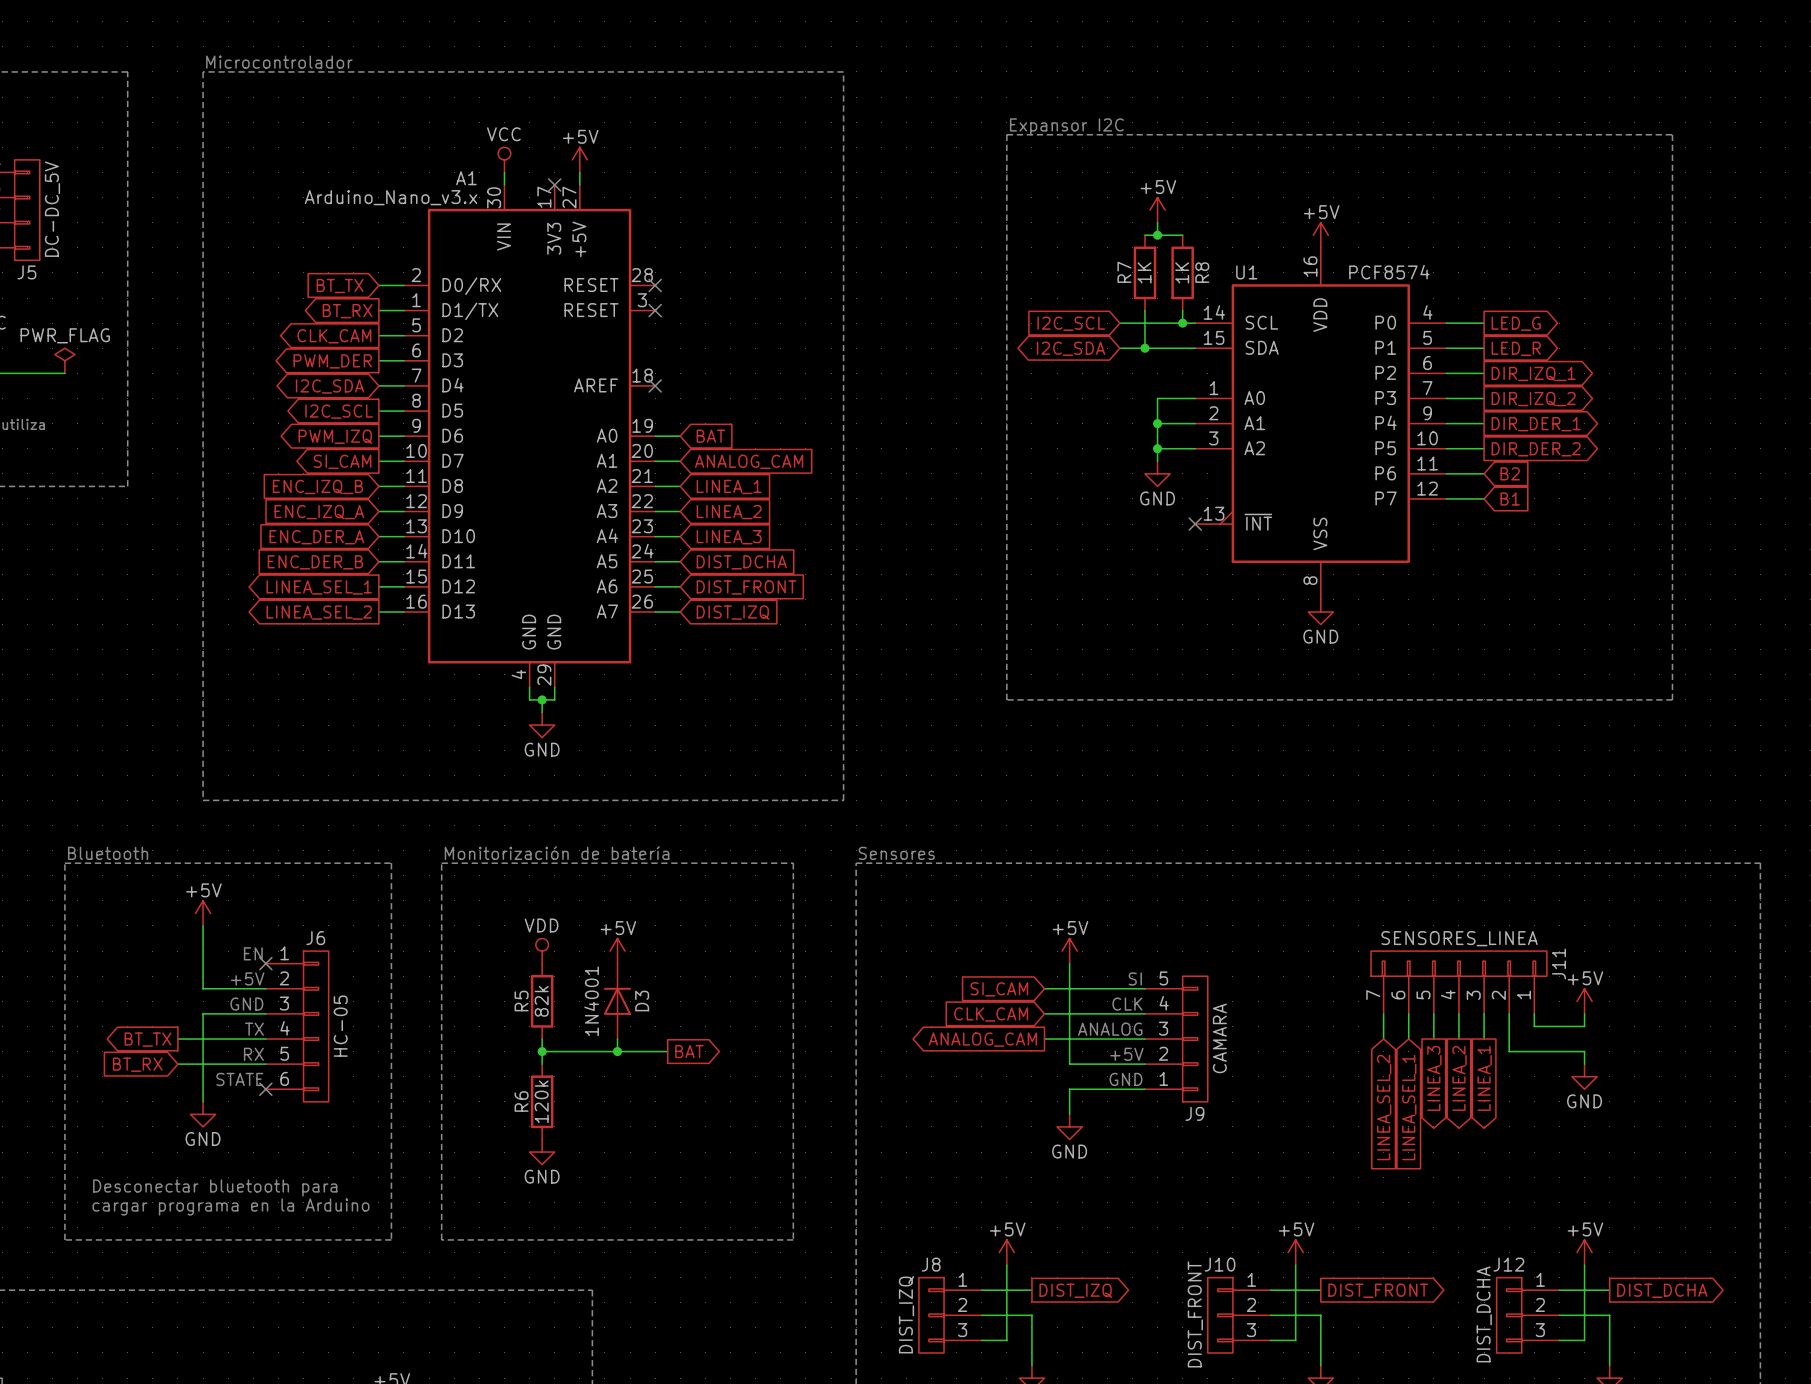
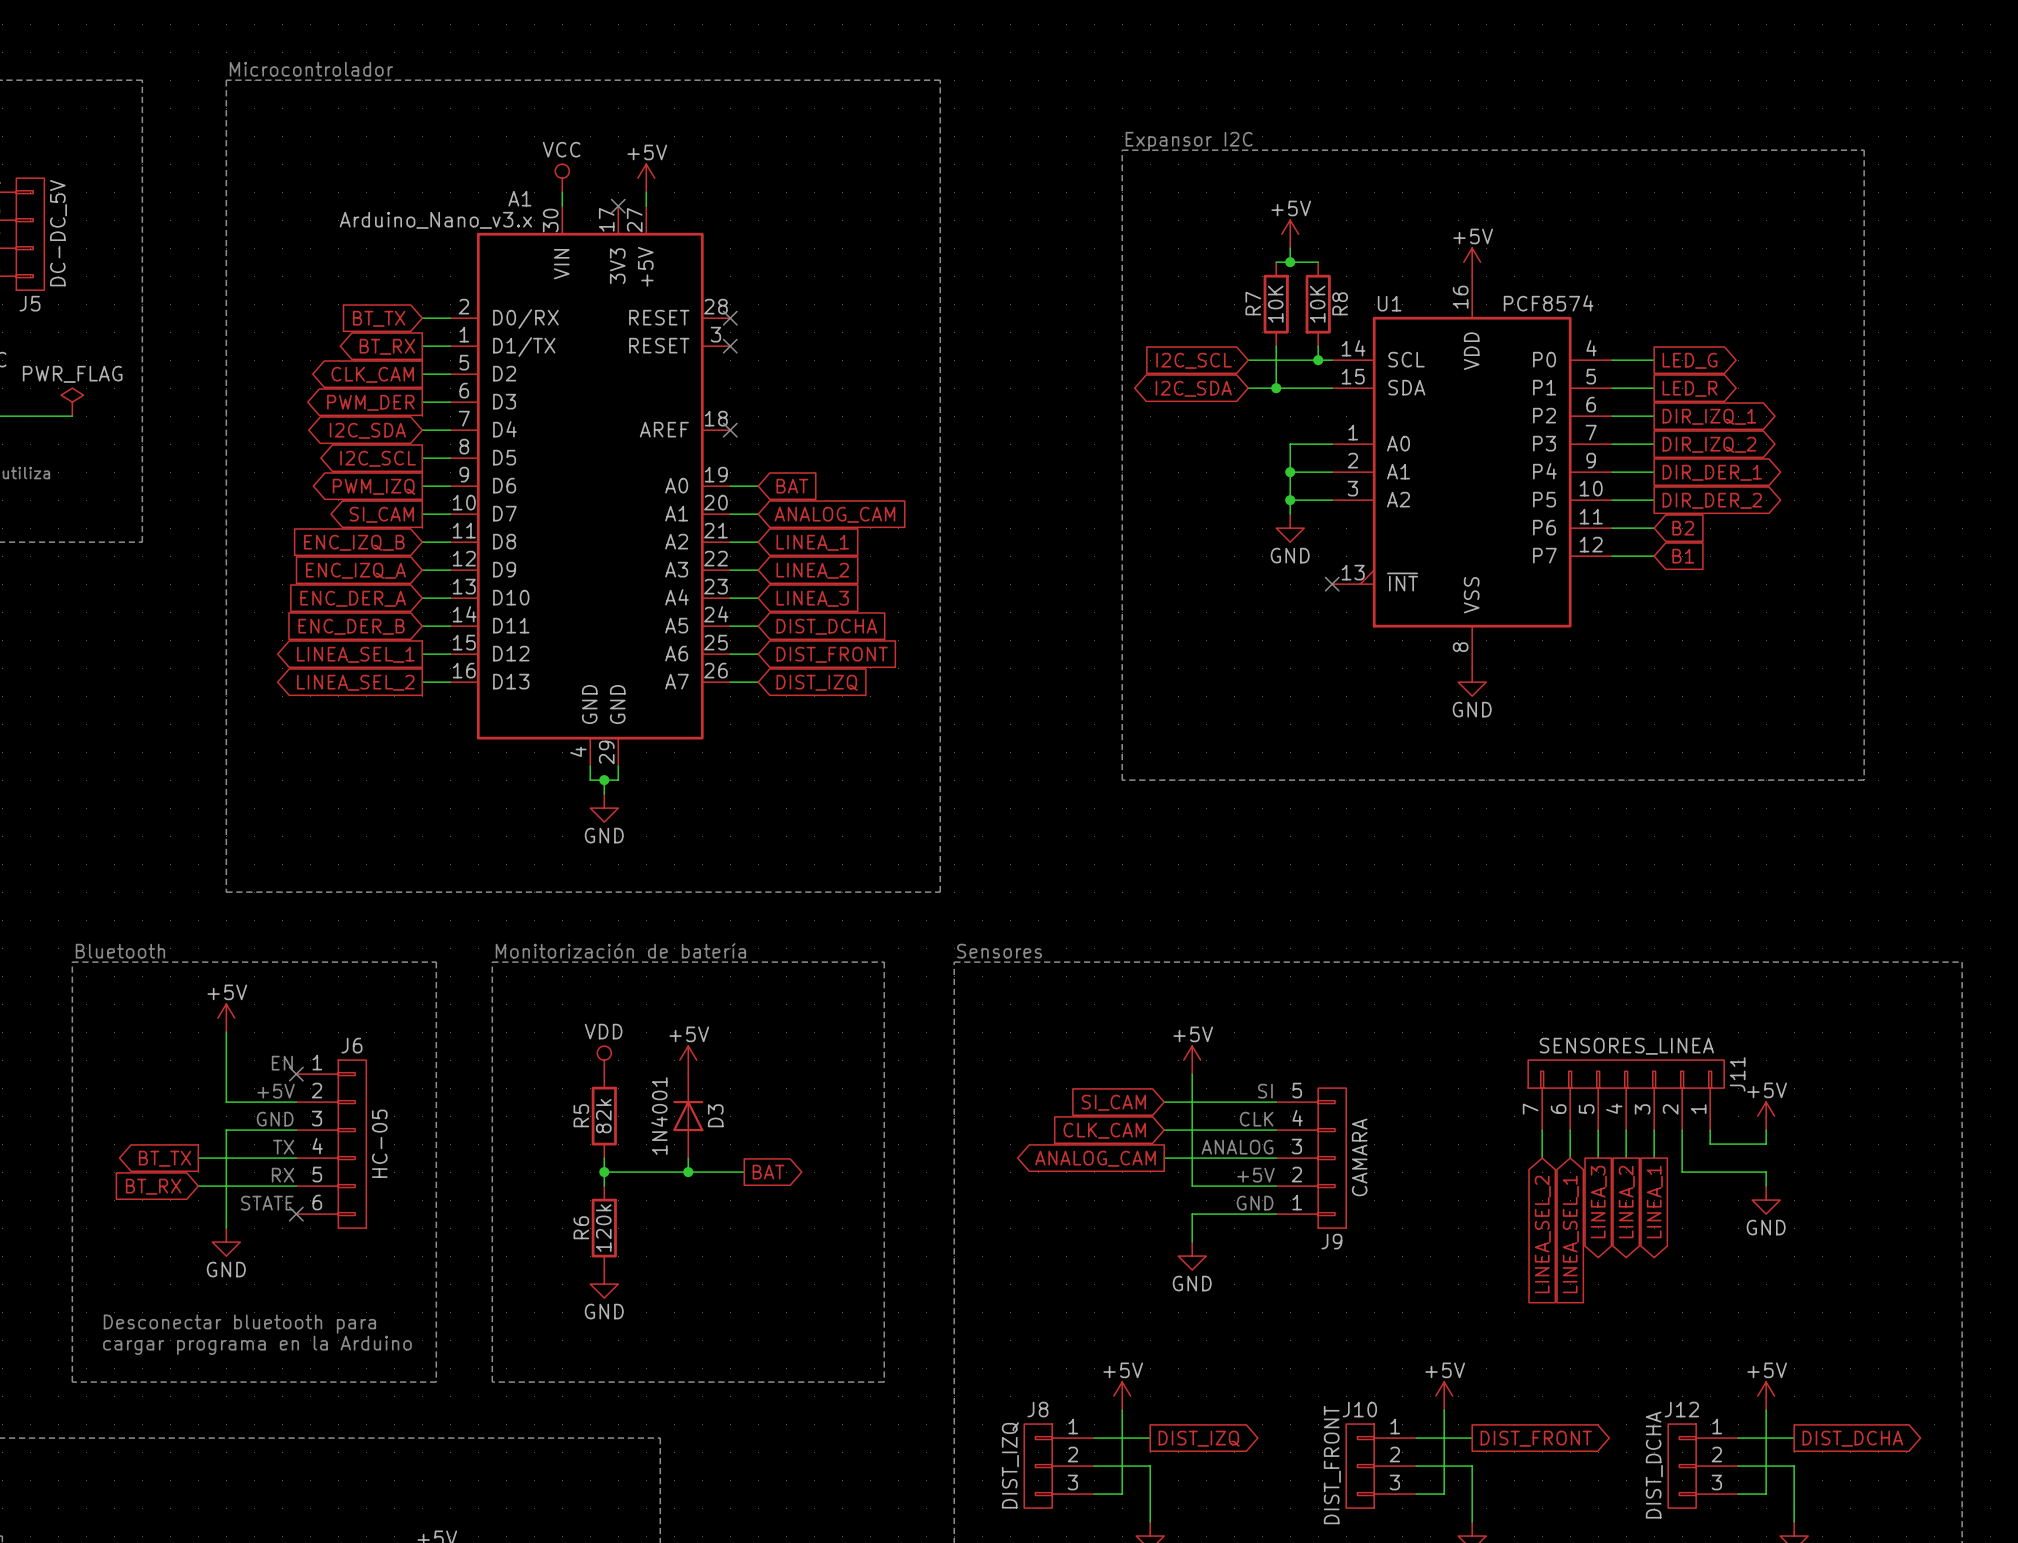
R7 value: 1K (1144, 272) -> 10K (1275, 304)
R8 value: 1K (1182, 272) -> 10K (1317, 304)

